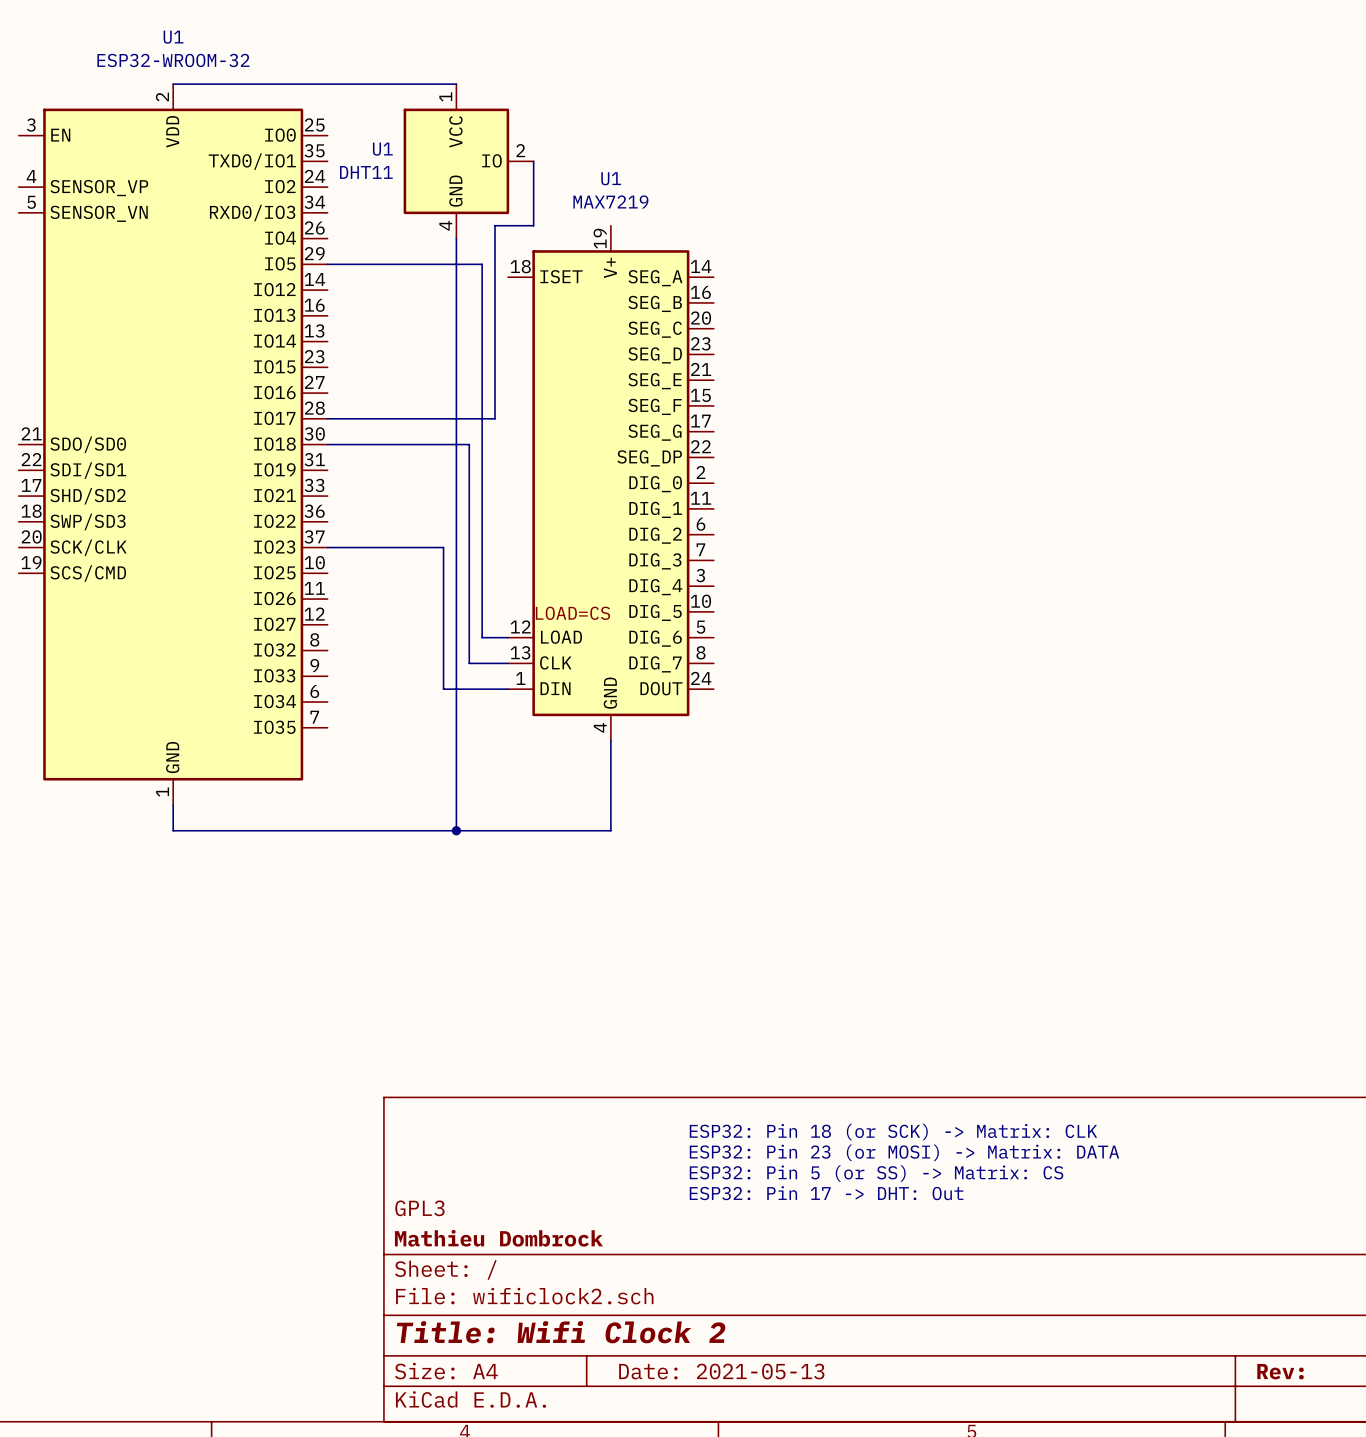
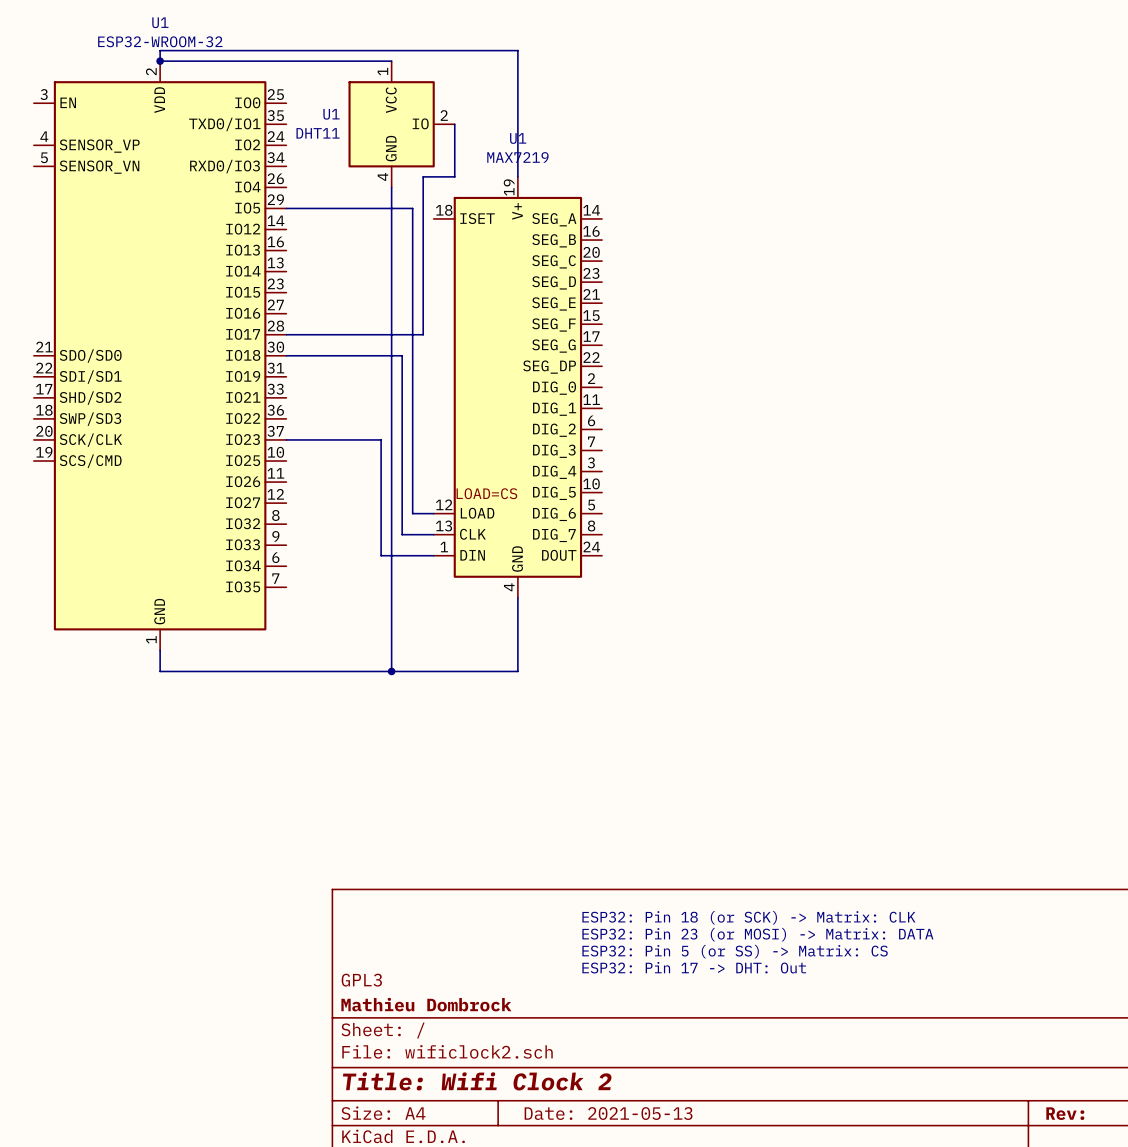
wire: none -> (160, 61) (160, 50) (517, 50) (517, 176)
junction: none -> (160, 61)

